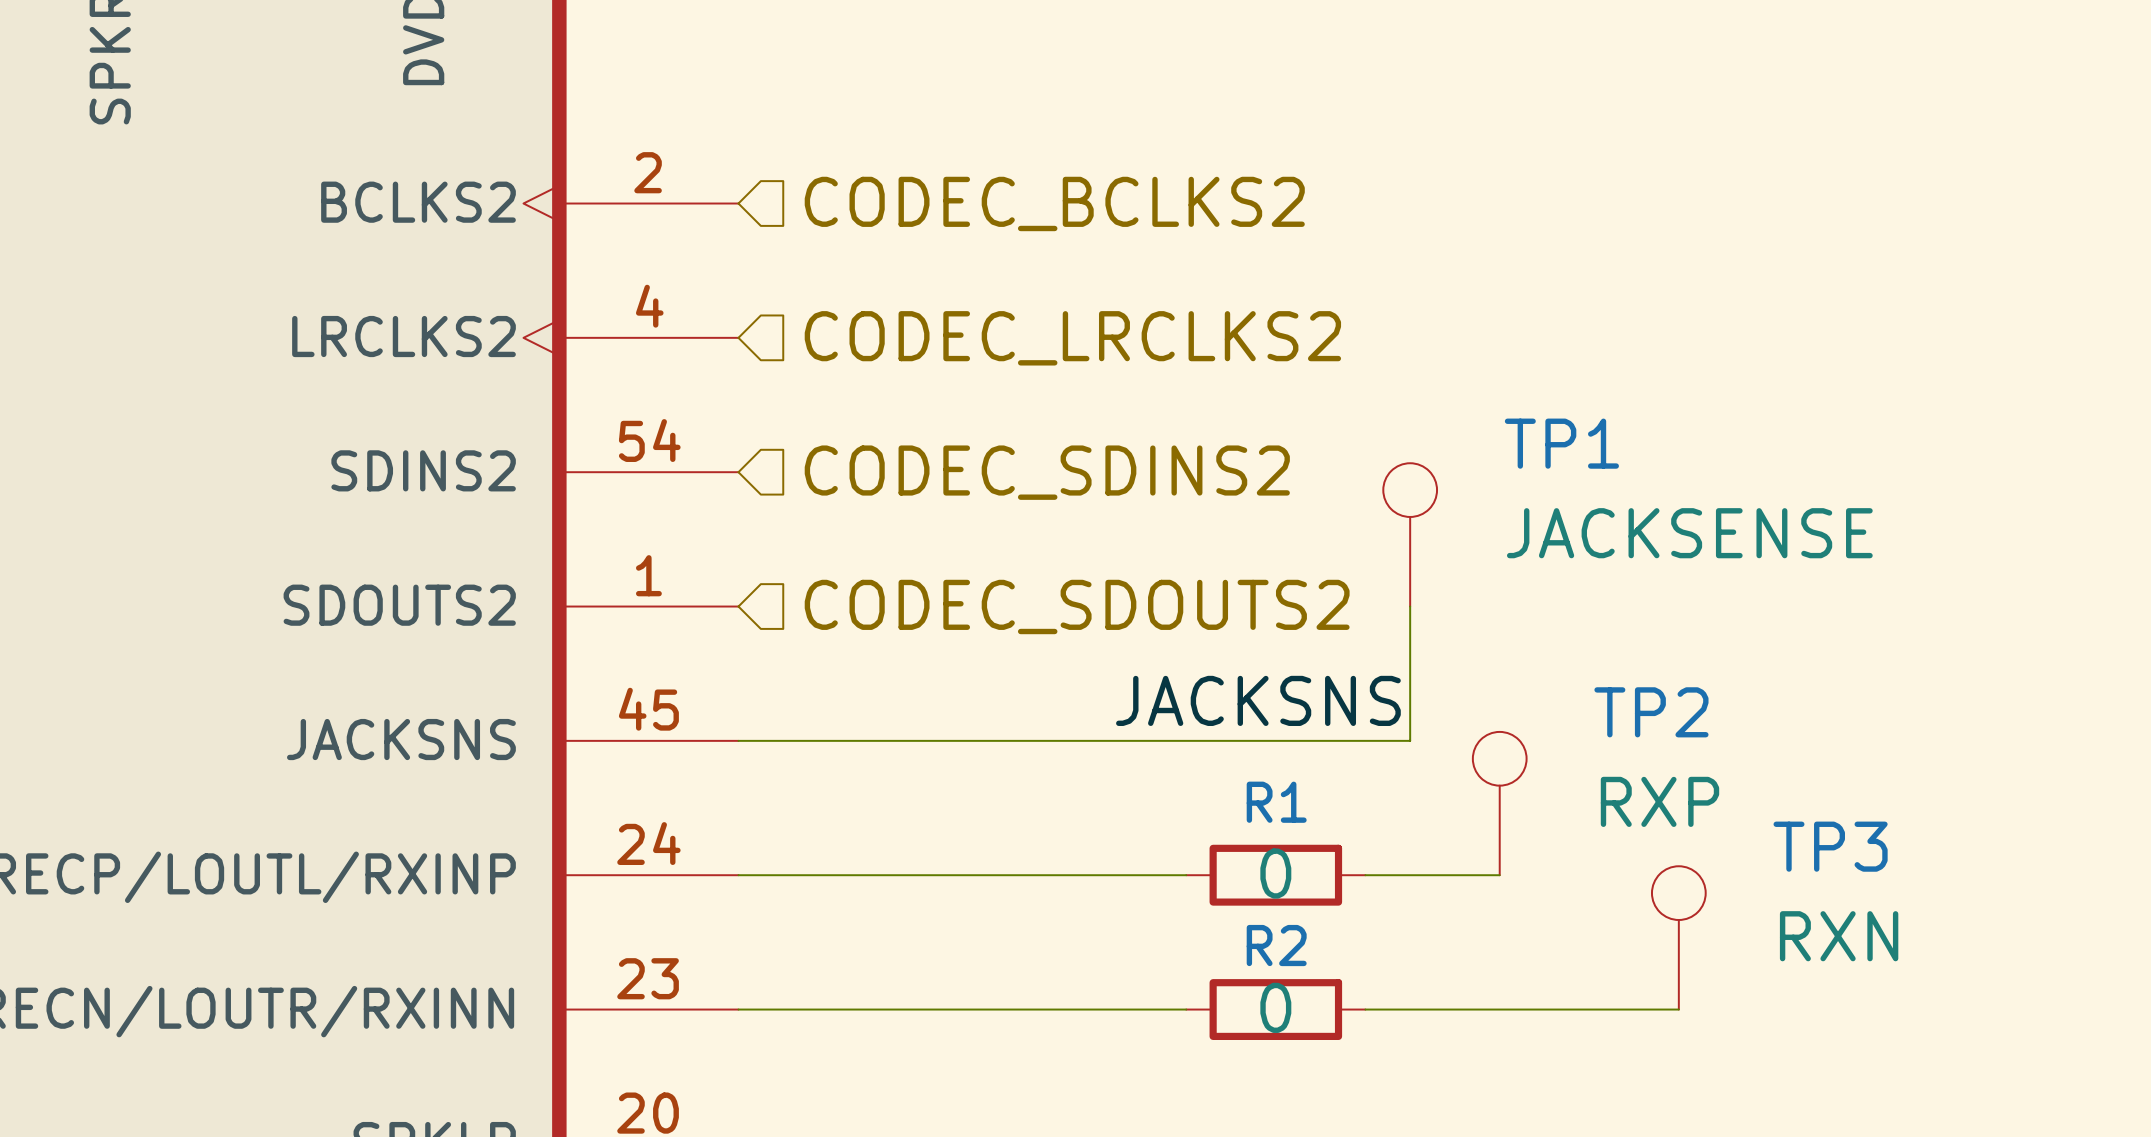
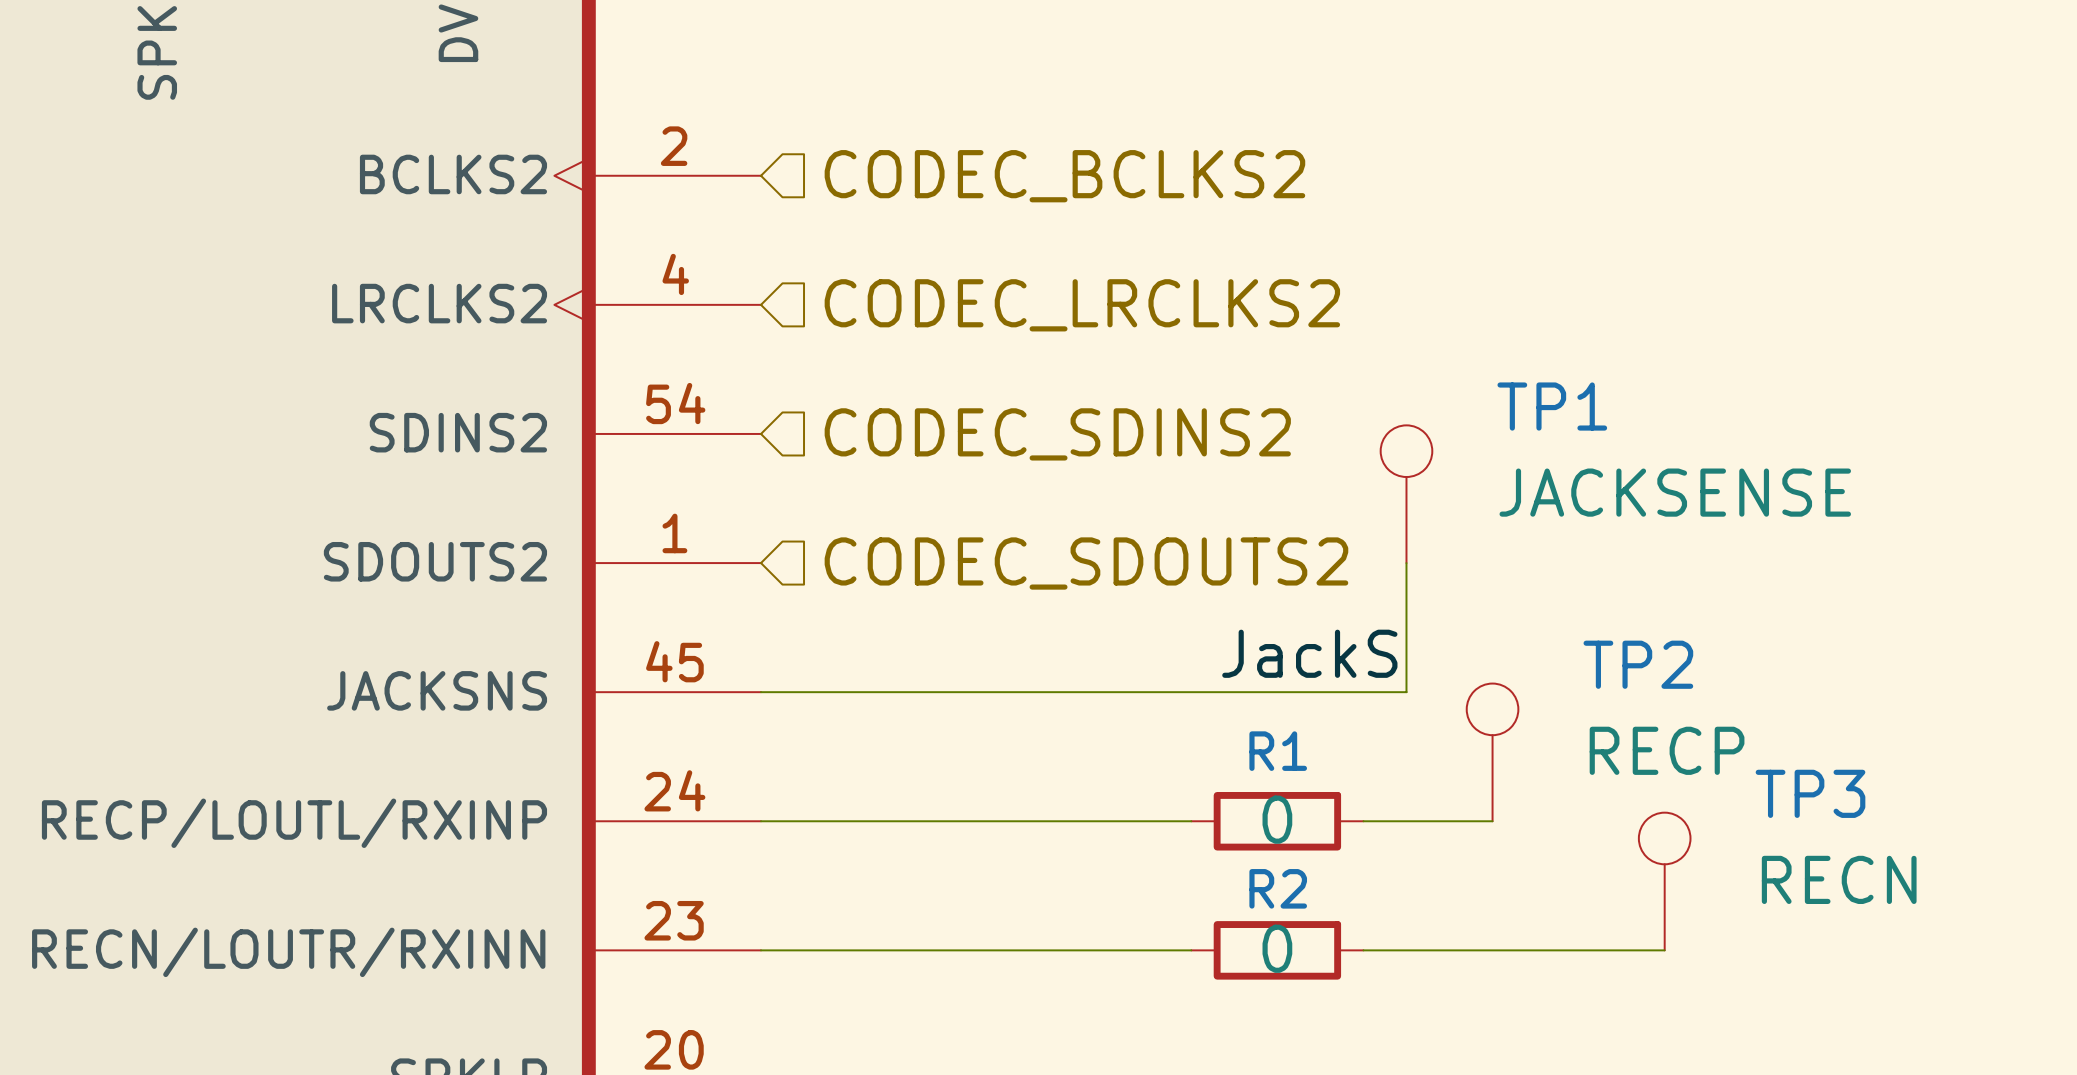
label: JACKSNS (1258, 700) -> JackS (1309, 653)
TP2 value: RXP (1659, 801) -> RECP (1667, 750)
TP3 value: RXN (1839, 936) -> RECN (1839, 879)

